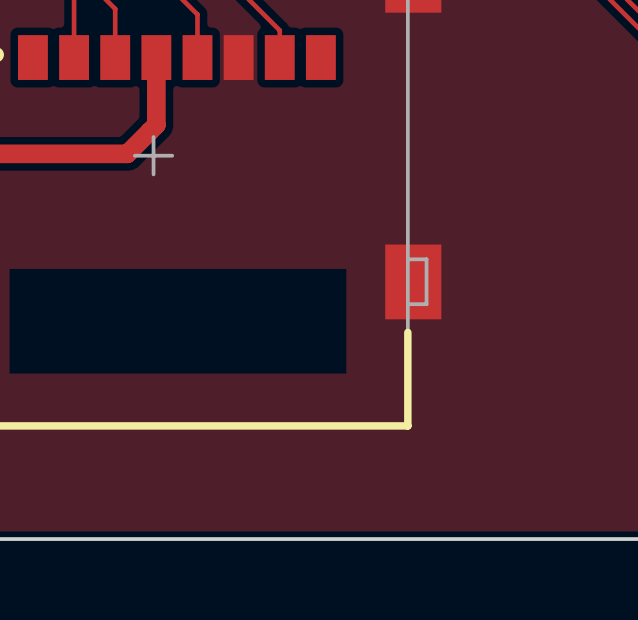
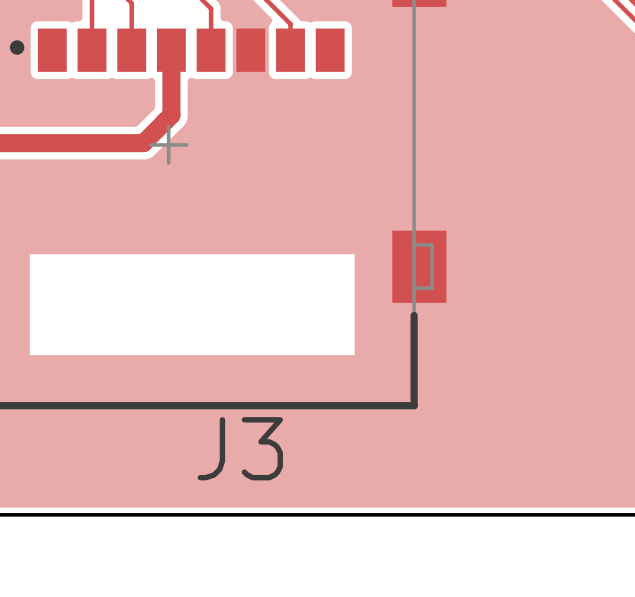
J3 name: none -> J3 (240, 448)

